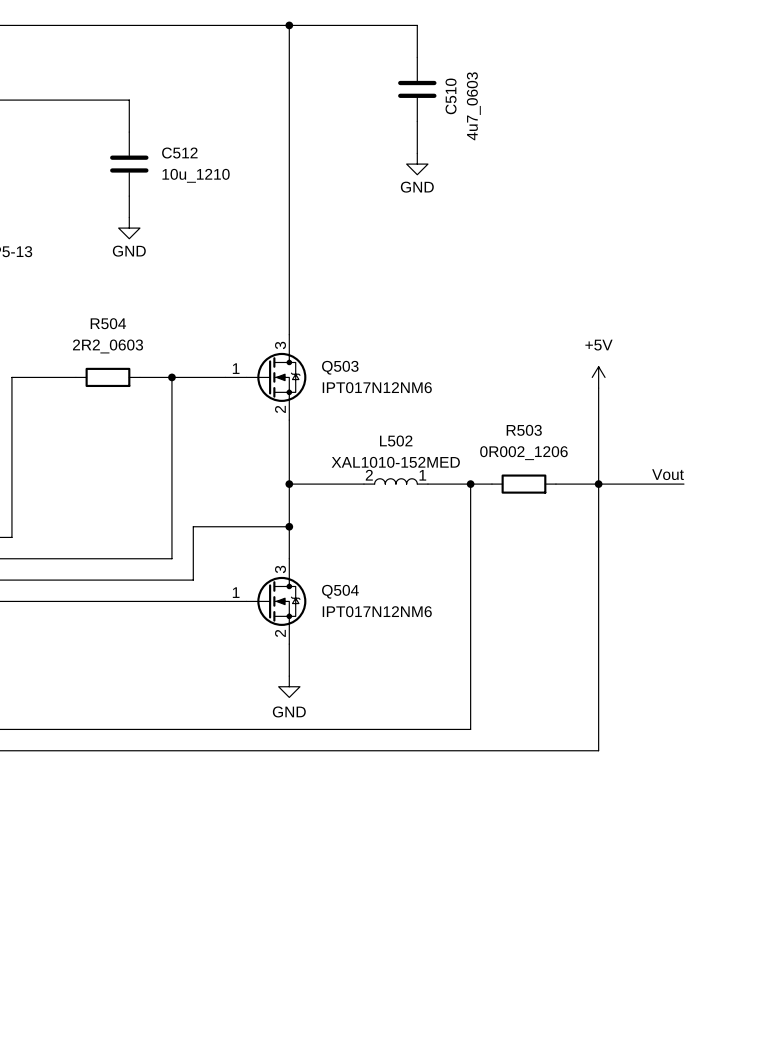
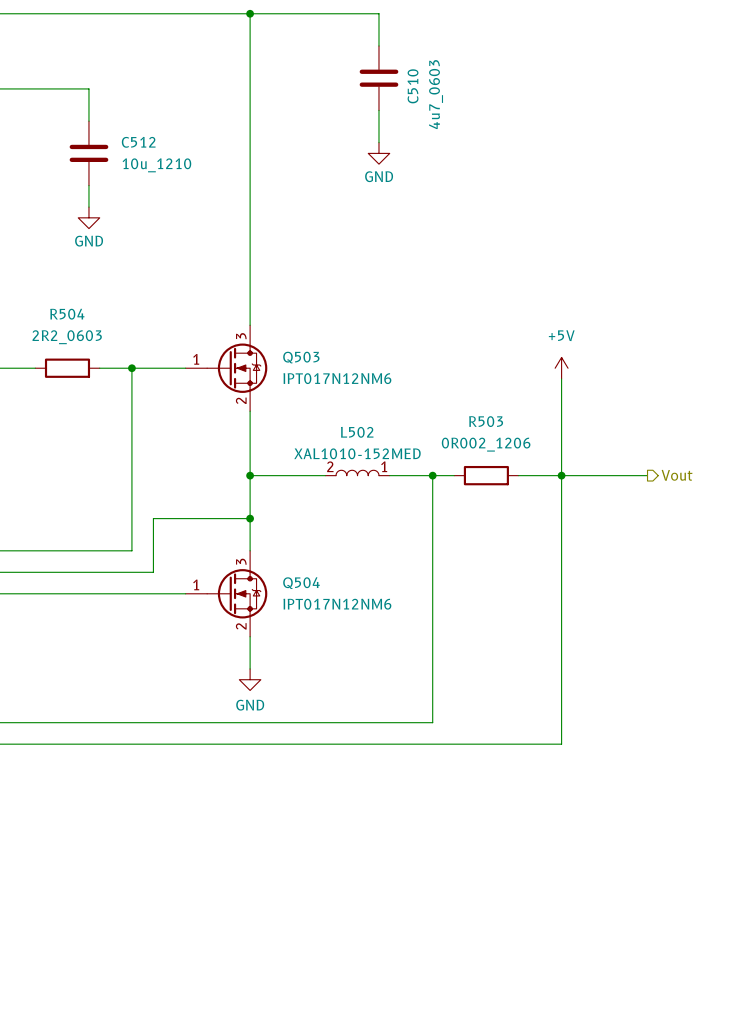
label: Vout (668, 474) -> none
hierarchical label: none -> Vout (677, 475)

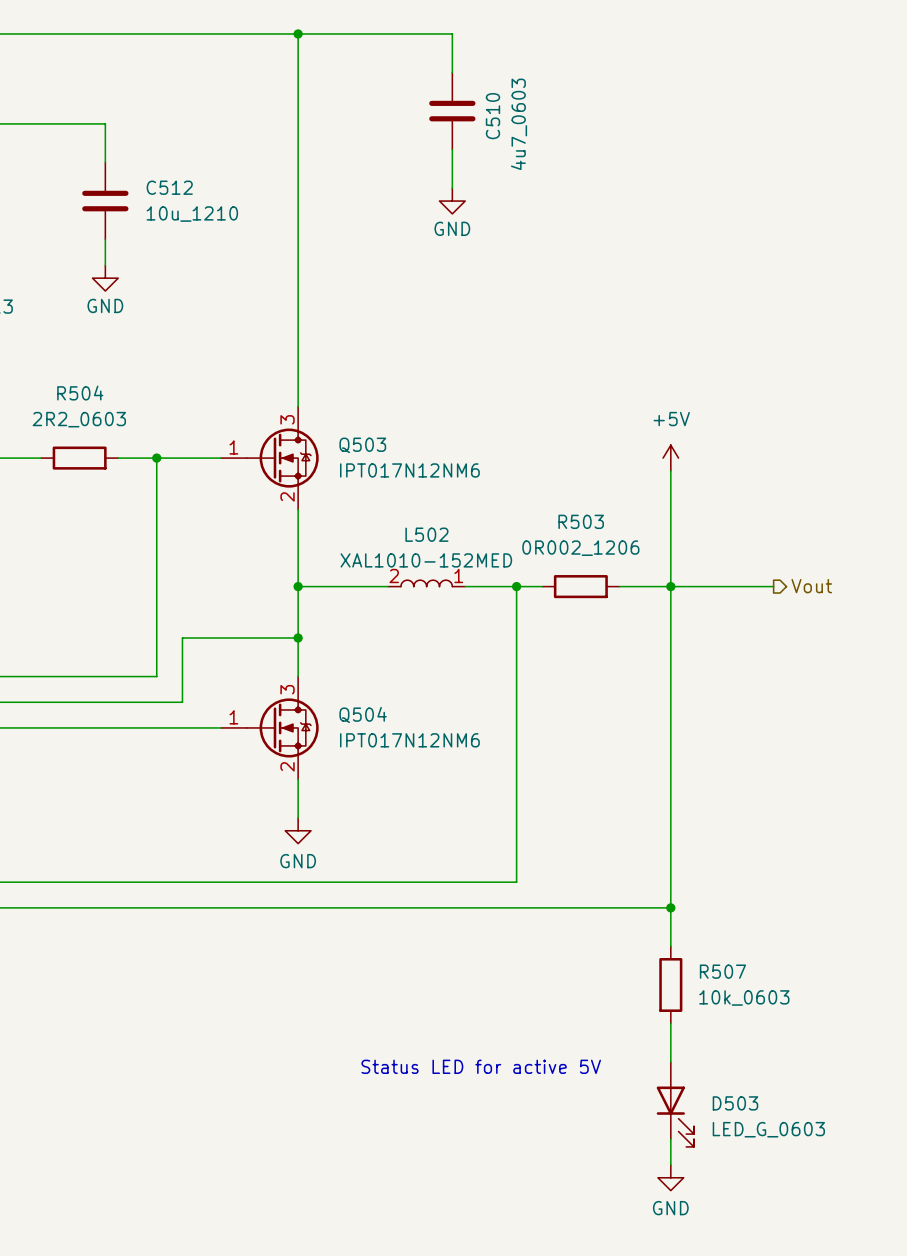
wire: none -> (670, 907) (670, 946)
junction: none -> (670, 907)
R507: none -> 10k_0603 (670, 984)
wire: none -> (670, 1023) (670, 1062)
text: none -> Status LED for active 5V (481, 1066)
D503: none -> LED_G_0603 (675, 1104)
wire: none -> (670, 1139) (670, 1164)
power symbol: none -> GND (670, 1177)

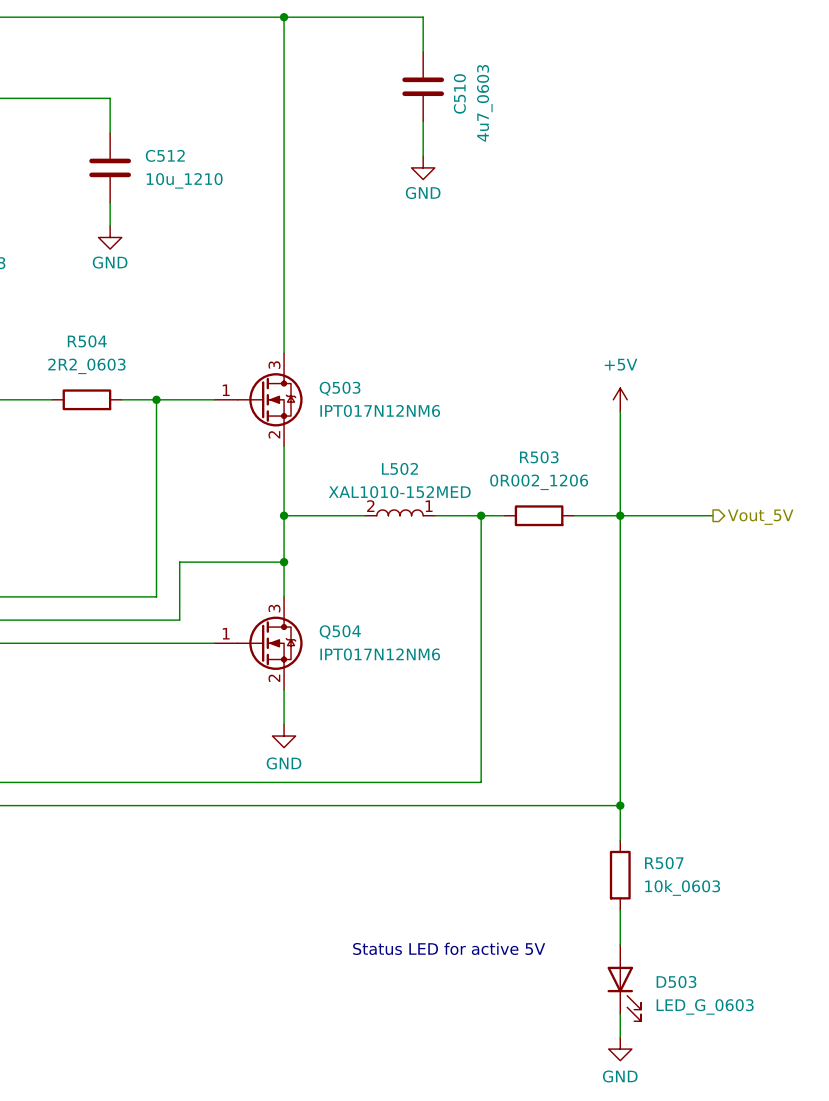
hierarchical label: Vout (811, 586) -> Vout_5V (760, 517)

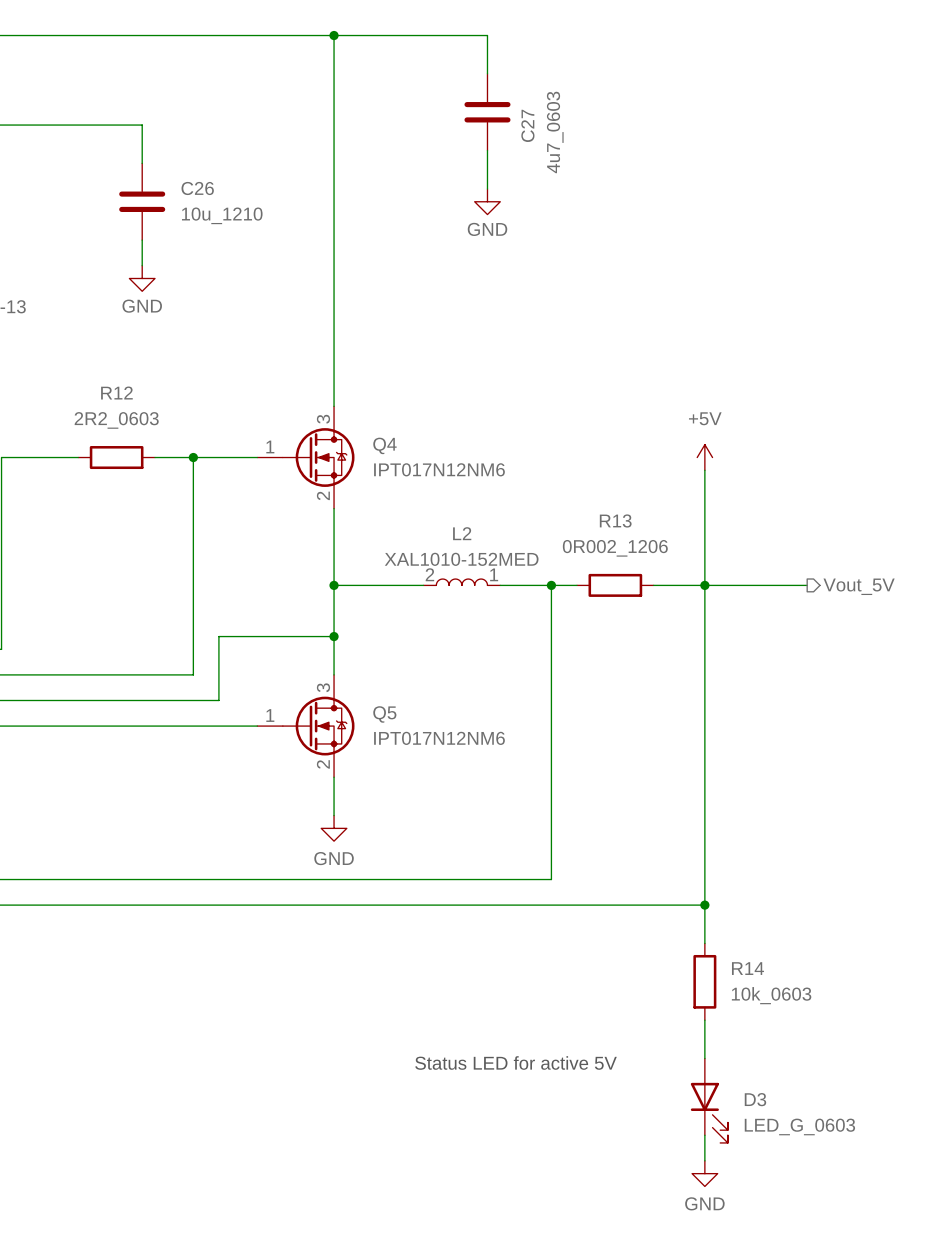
C510 name: C510 (459, 93) -> C27 (527, 125)
C512 name: C512 (165, 155) -> C26 (197, 188)
R504 name: R504 (87, 341) -> R12 (116, 393)
Q503 name: Q503 (340, 388) -> Q4 (384, 445)
R503 name: R503 (539, 457) -> R13 (615, 520)
L502 name: L502 (399, 468) -> L2 (462, 533)
Q504 name: Q504 (340, 632) -> Q5 (384, 714)
R507 name: R507 (664, 863) -> R14 (747, 968)
D503 name: D503 (676, 981) -> D3 (755, 1099)

